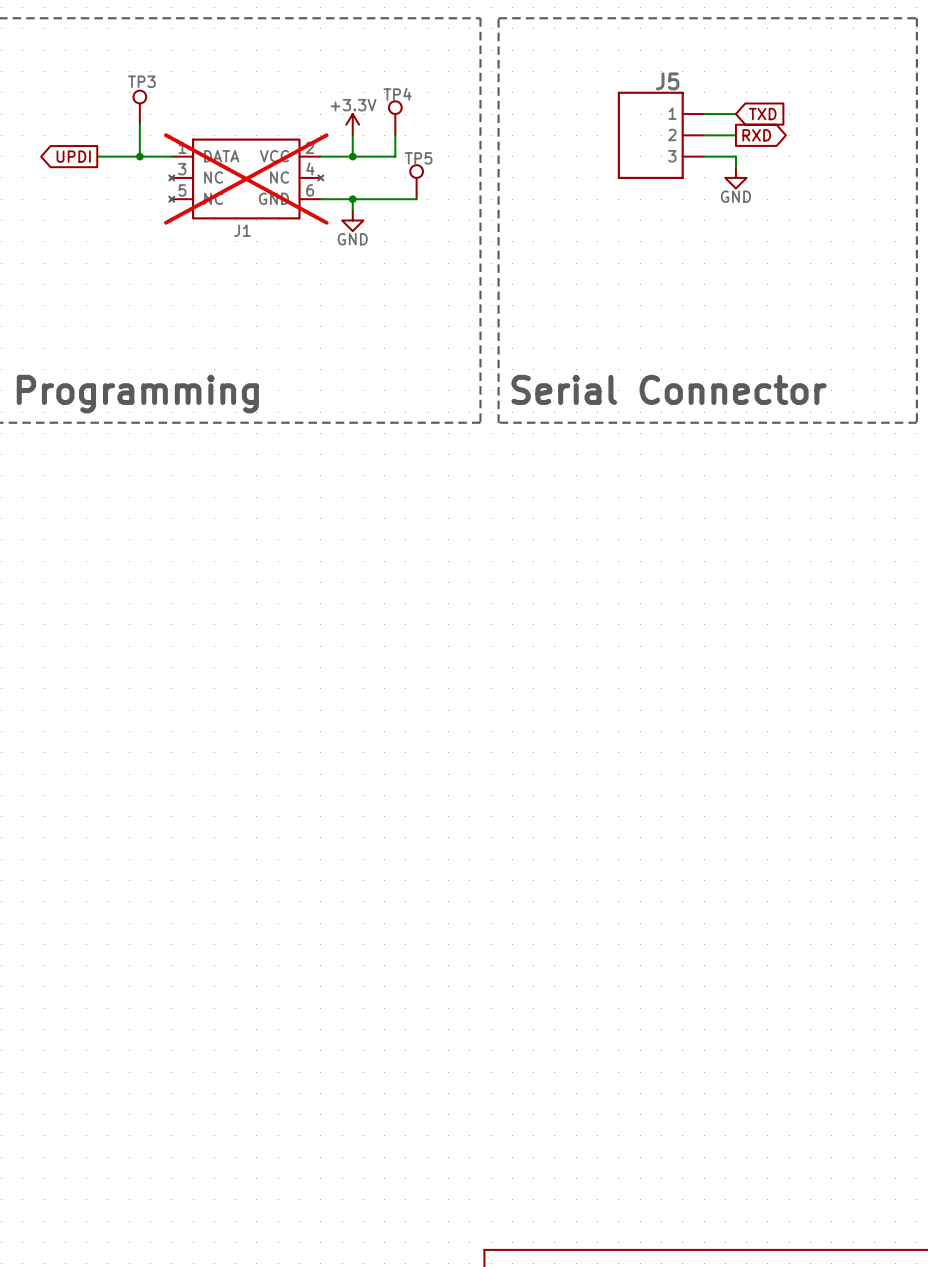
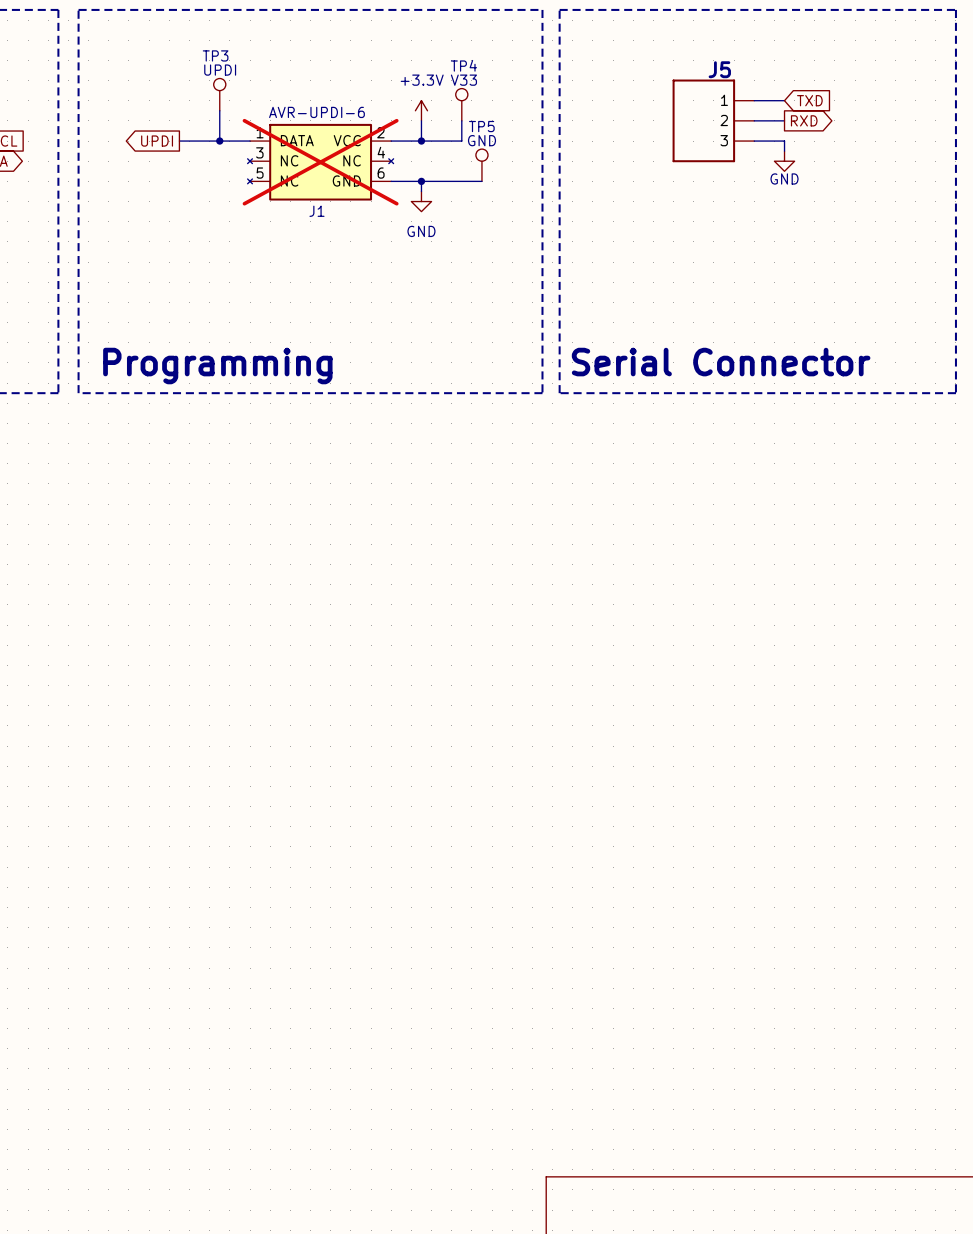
TP3 value: none -> UPDI (220, 70)
TP3 name position: TP3 (141, 81) -> TP3 (215, 55)
TP4 value: none -> V33 (463, 80)
TP4 name position: TP4 (397, 94) -> TP4 (463, 65)
power symbol text position: +3.3V (353, 105) -> +3.3V (422, 80)
J1 value: none -> AVR-UPDI-6 (316, 112)
TP5 value: none -> GND (482, 140)
TP5 name position: TP5 (418, 158) -> TP5 (481, 126)
power symbol text position: GND (352, 239) -> GND (421, 231)

